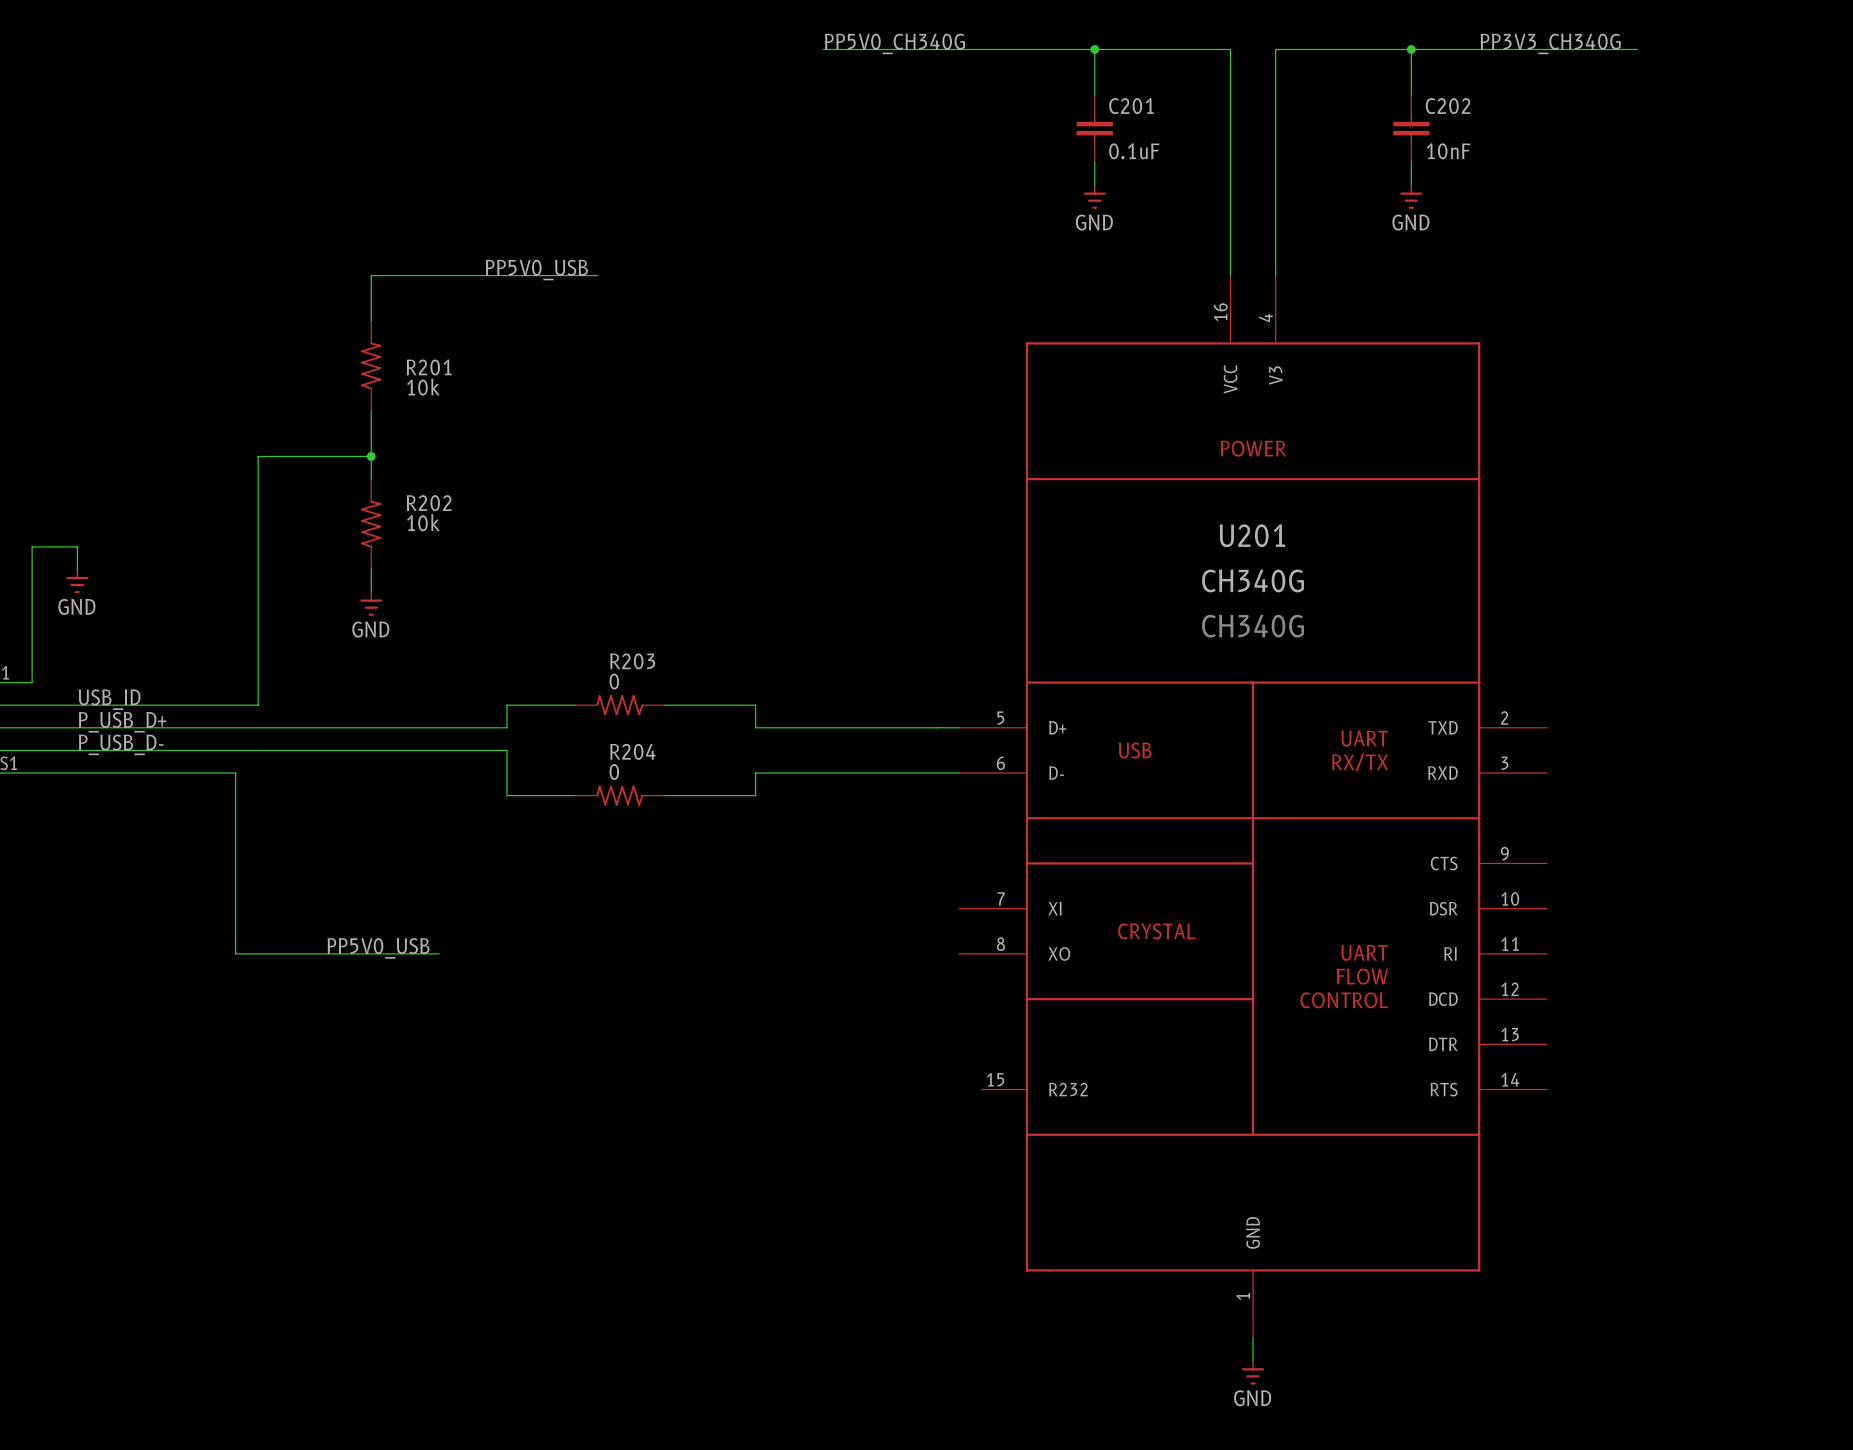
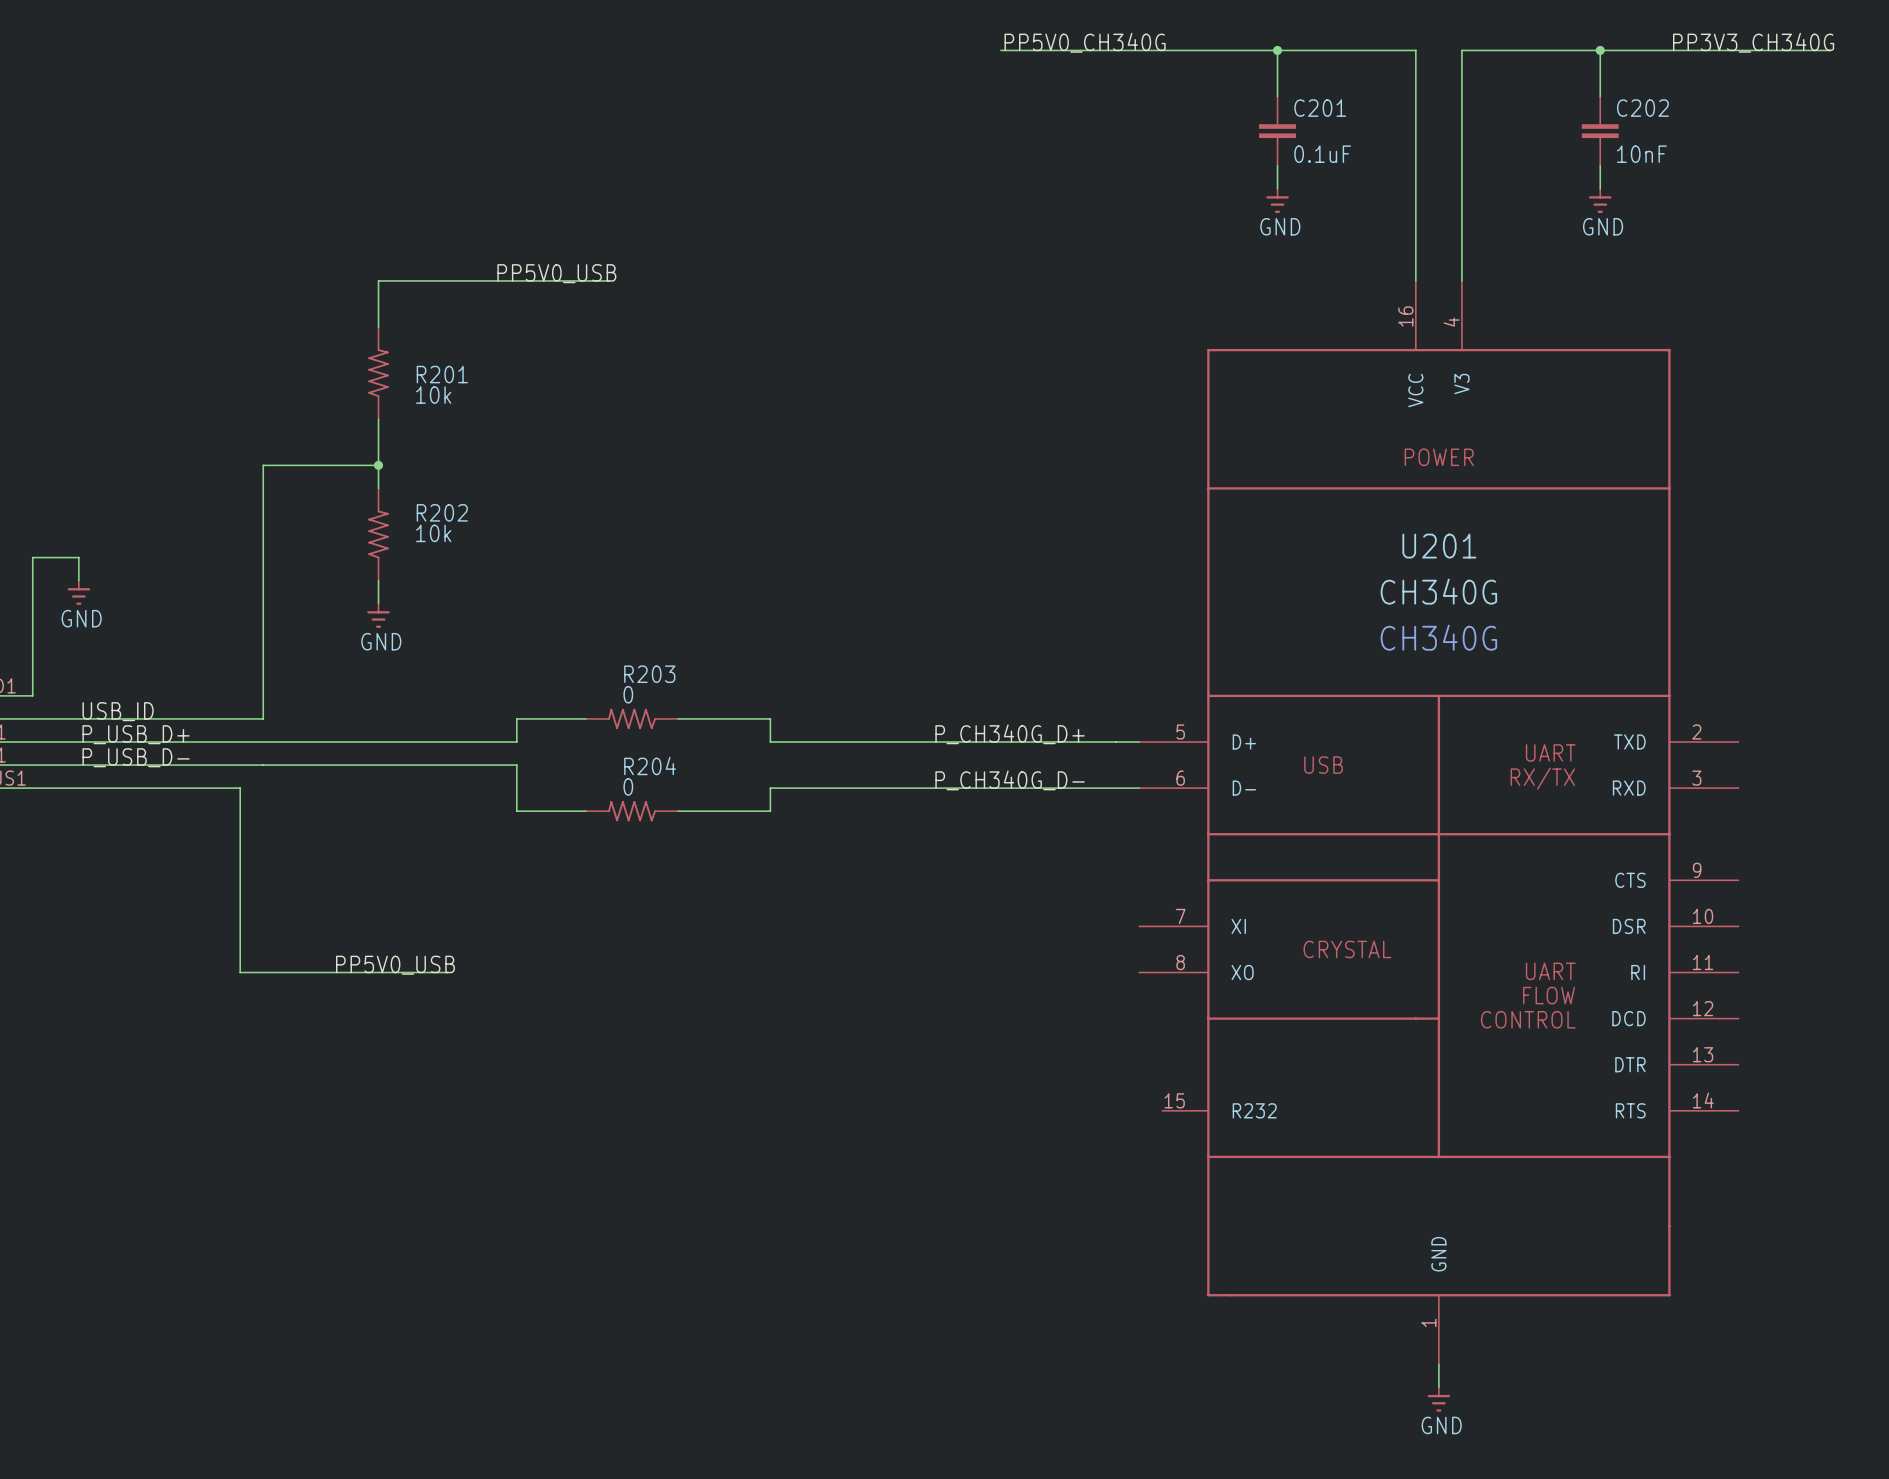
label position: PP5V0_CH340G (894, 43) -> PP5V0_CH340G (1085, 42)
label position: PP3V3_CH340G (1550, 43) -> PP3V3_CH340G (1753, 42)
wire: (823, 49) (981, 49) -> none
wire: (1094, 49) (1094, 94) -> (1277, 50) (1277, 96)
junction: (1094, 49) -> none
wire: (1230, 49) (1230, 275) -> (1254, 50) (1300, 50)
junction: none -> (1277, 50)
wire: (1275, 49) (1275, 275) -> (1461, 50) (1461, 280)
wire: (1388, 49) (1433, 49) -> (1415, 50) (1415, 280)
wire: (1411, 49) (1411, 94) -> (1600, 50) (1600, 96)
junction: (1411, 49) -> none
junction: none -> (1600, 50)
wire: none -> (1669, 50) (1830, 50)
C201 position: (1094, 128) -> (1277, 131)
C202 position: (1411, 128) -> (1600, 131)
wire: (1094, 162) (1094, 185) -> (1277, 165) (1277, 188)
wire: (1411, 162) (1411, 185) -> (1600, 165) (1600, 188)
power symbol: GND (1094, 196) -> none
power symbol: none -> GND (1277, 200)
power symbol: GND (1411, 196) -> none
power symbol: none -> GND (1600, 200)
label: none -> P_CH340G_D+ (1010, 734)
wire: none -> (977, 742) (1139, 742)
label: none -> P_CH340G_D- (1010, 780)
wire: none -> (977, 788) (1139, 788)
U201 position: (1253, 806) -> (1438, 822)
wire: (1253, 1338) (1253, 1360) -> (1438, 1364) (1438, 1387)
power symbol position: GND (1253, 1372) -> GND (1438, 1399)

